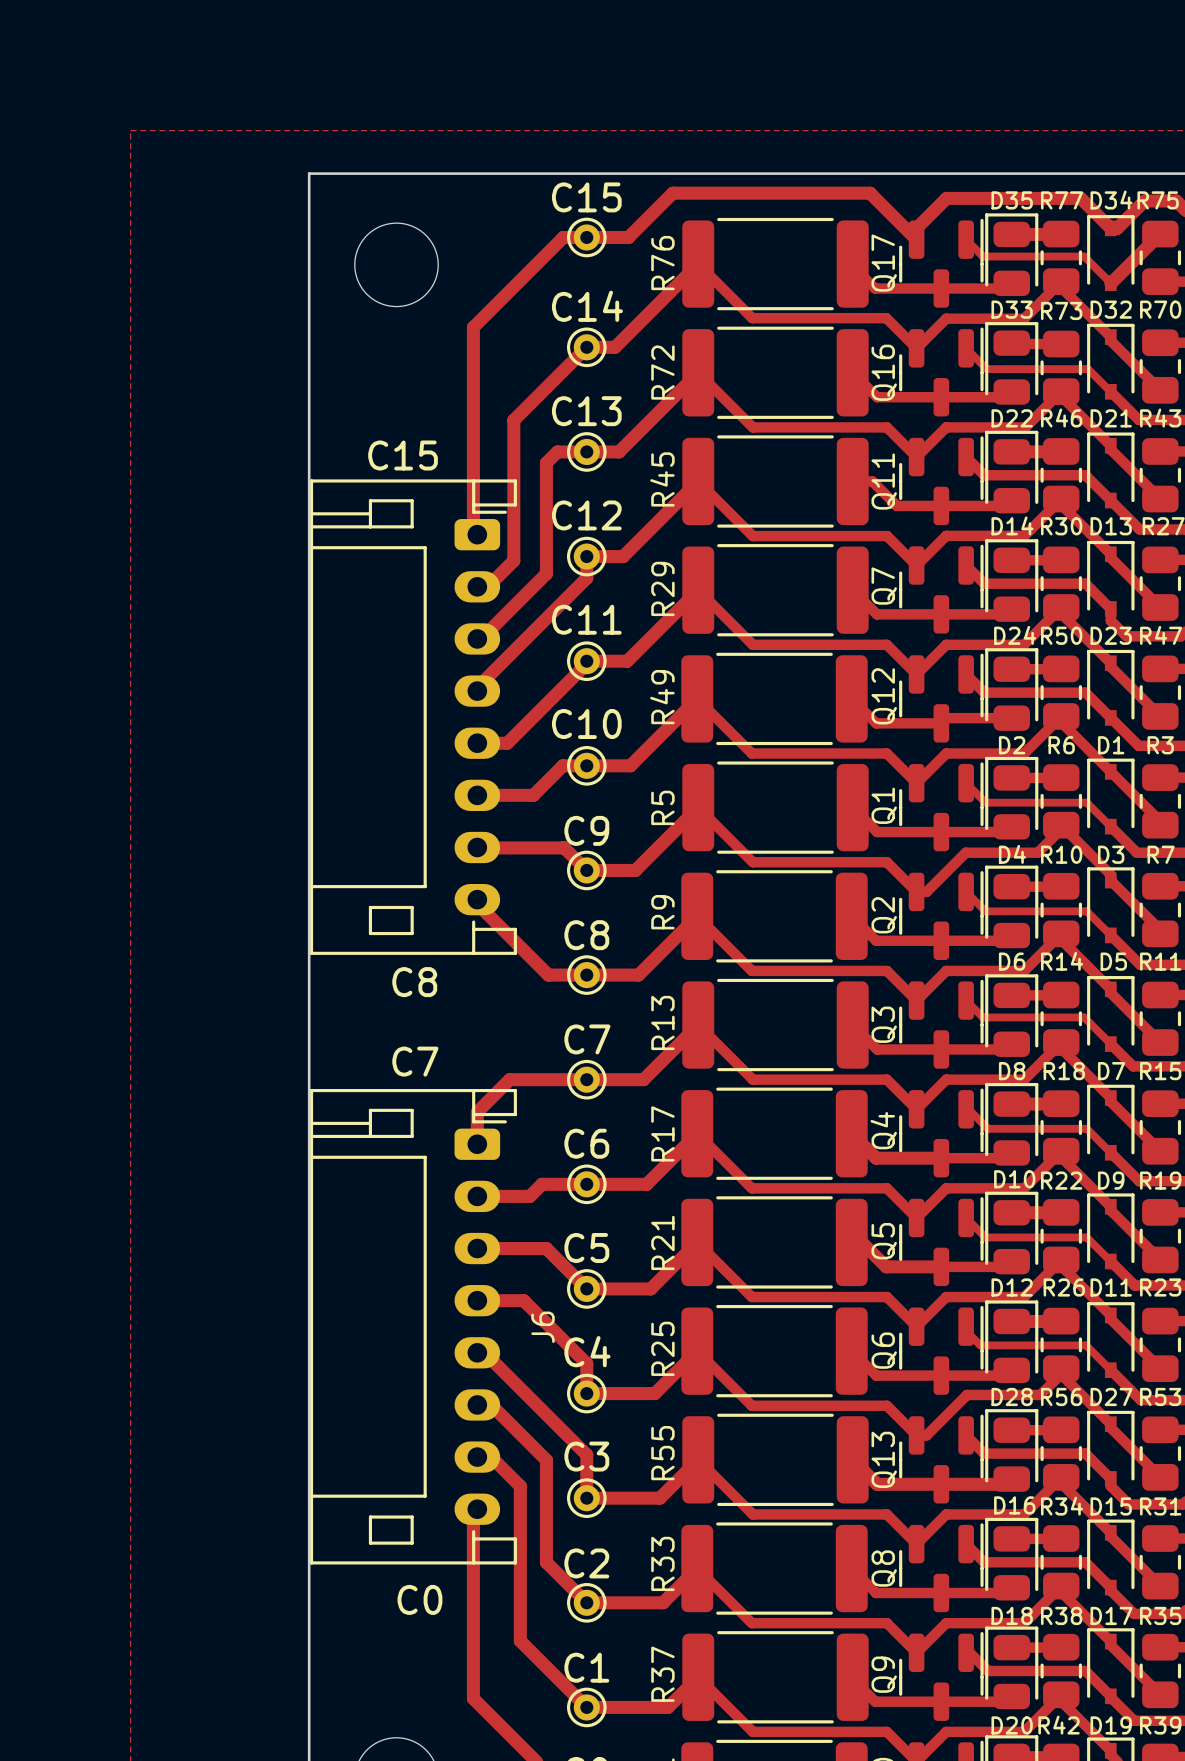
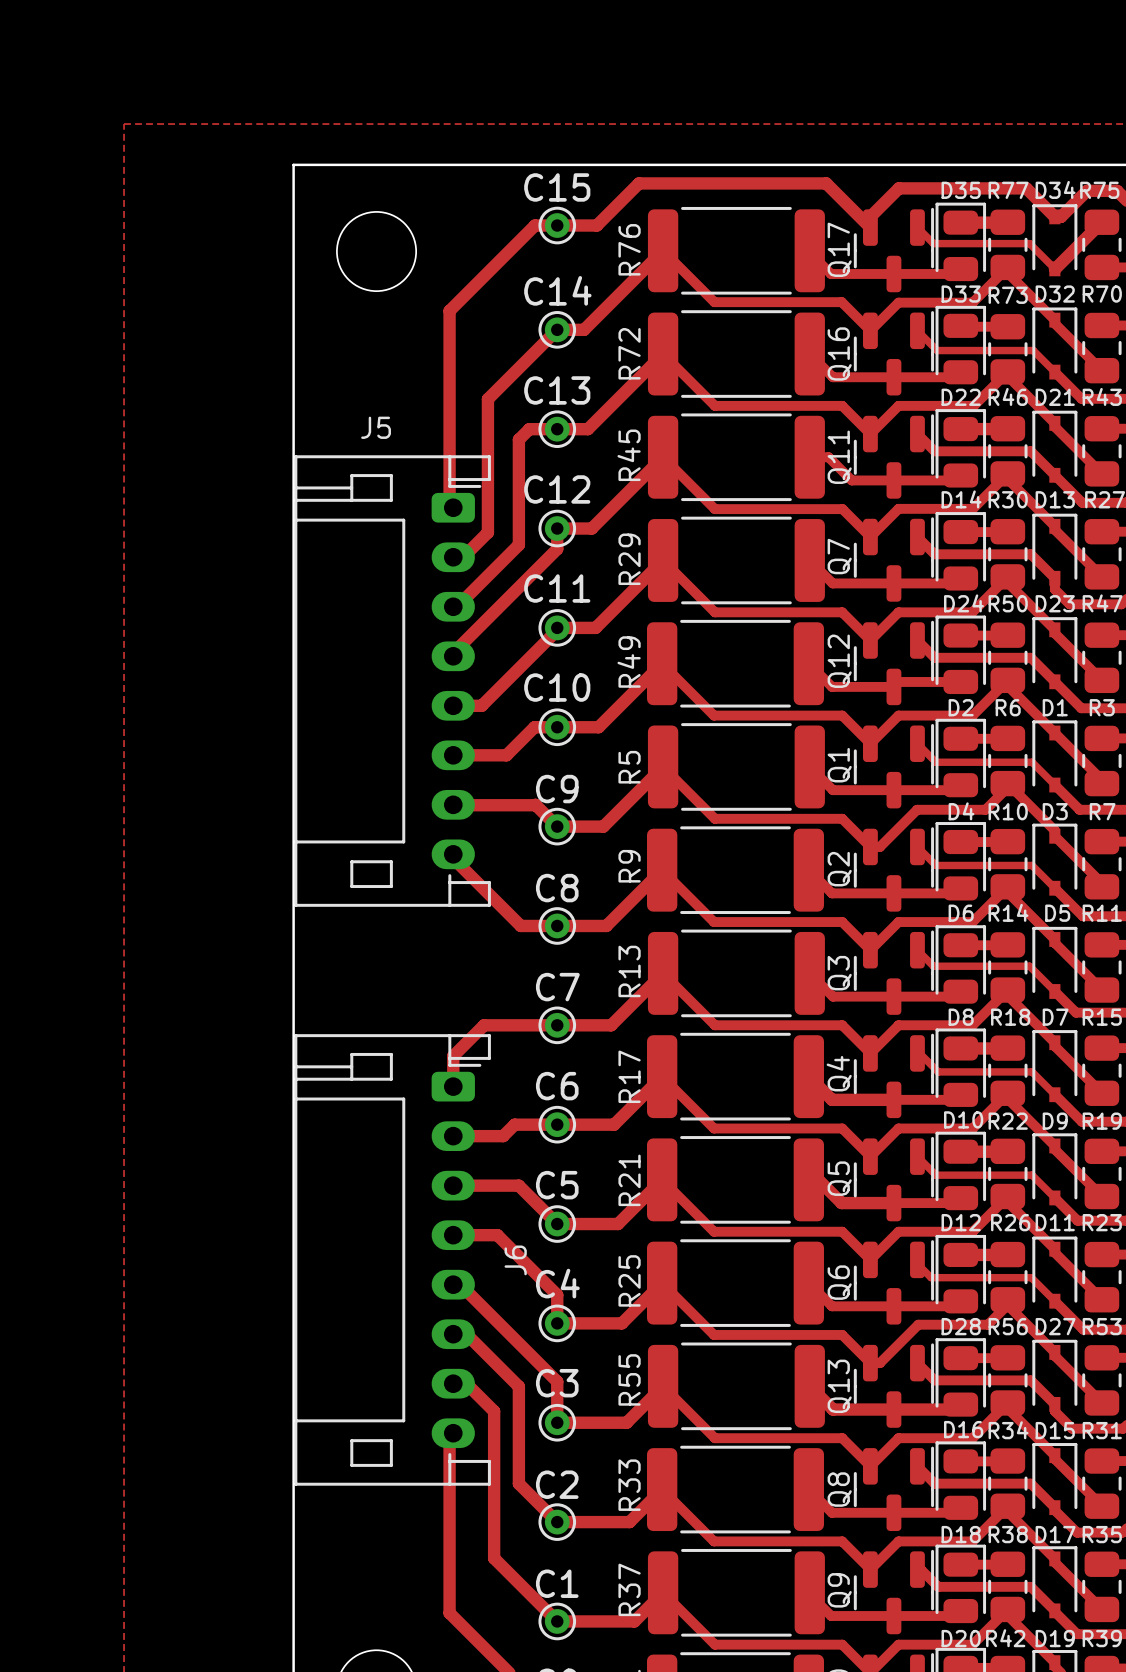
J5 name: none -> J5 (376, 427)
text: C15 (403, 455) -> none
text: C8 (414, 982) -> none
text: C7 (415, 1061) -> none
text: C0 (419, 1599) -> none

